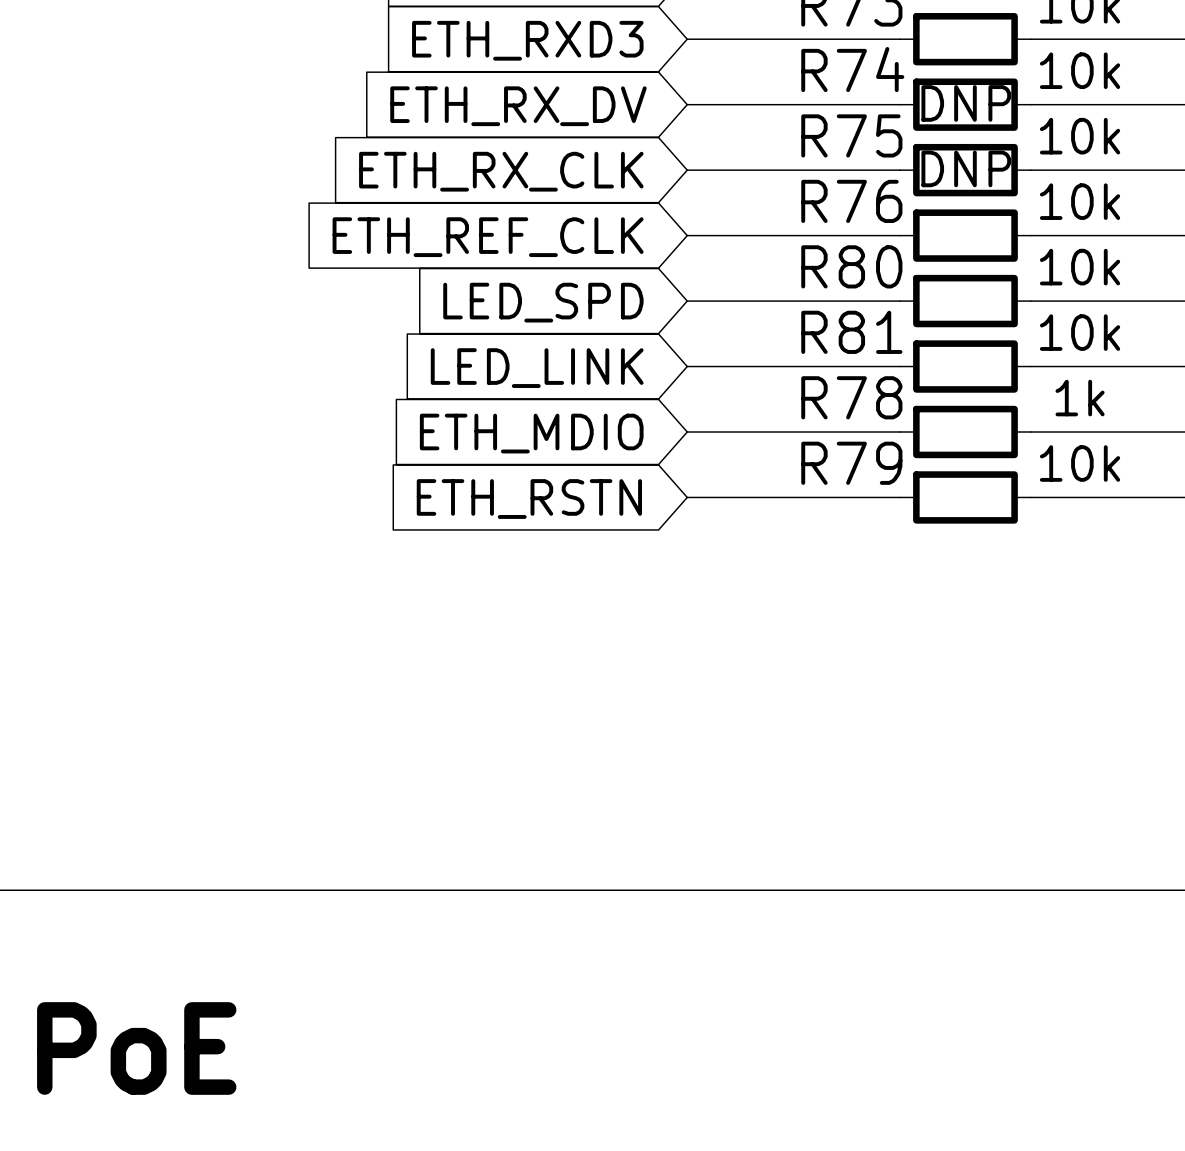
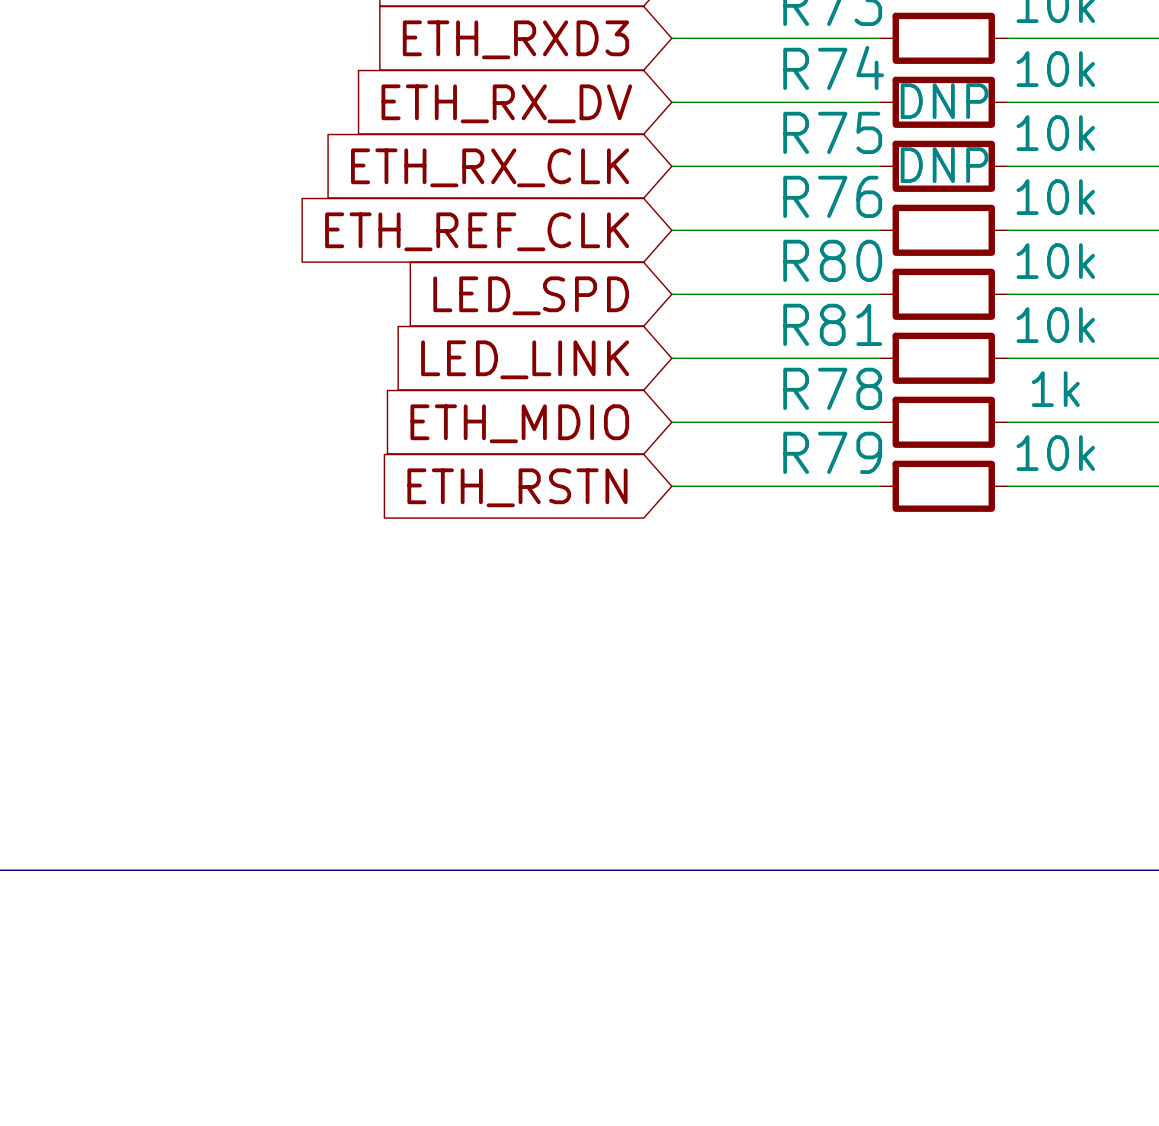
text: PoE (136, 1048) -> none

